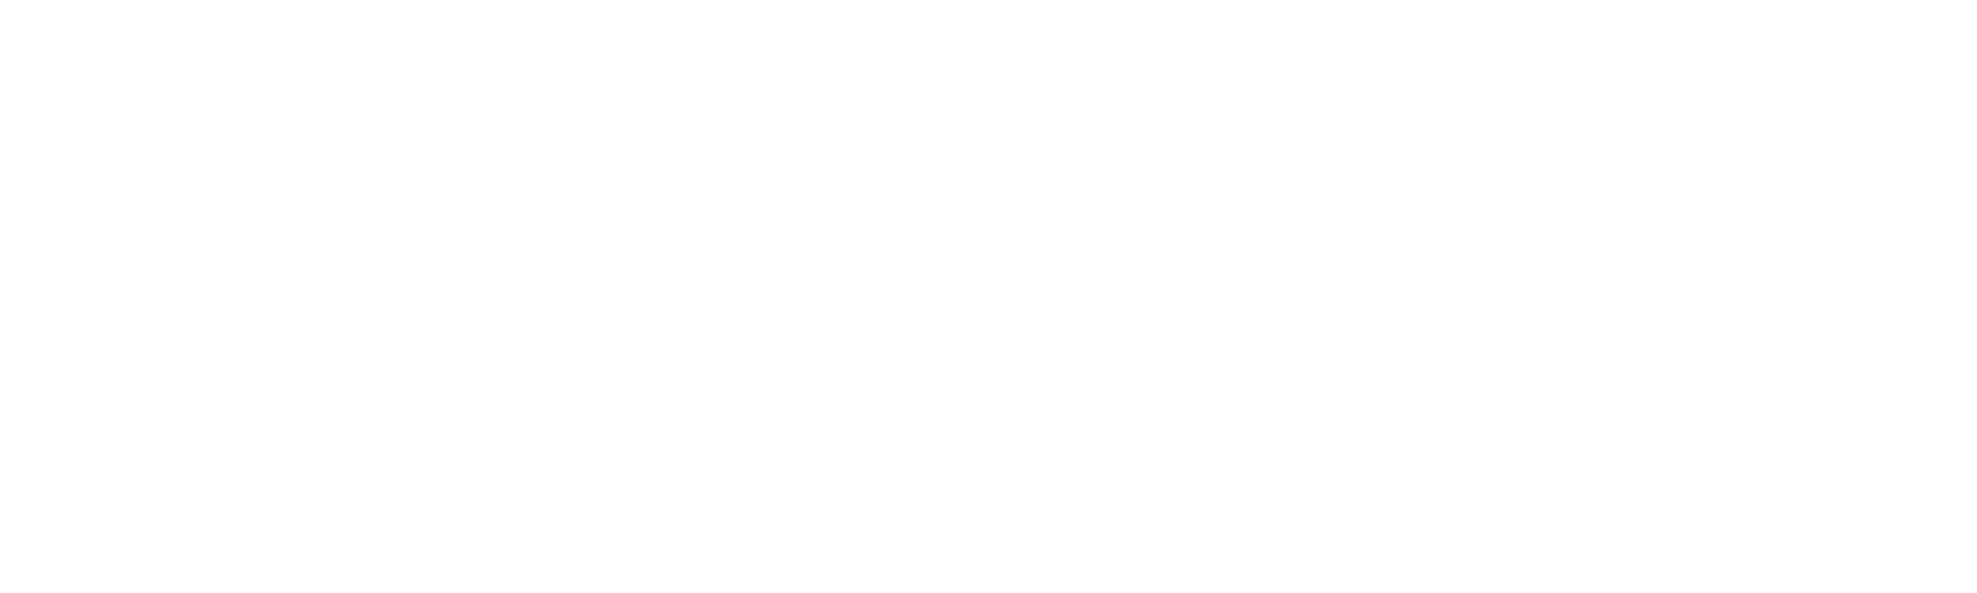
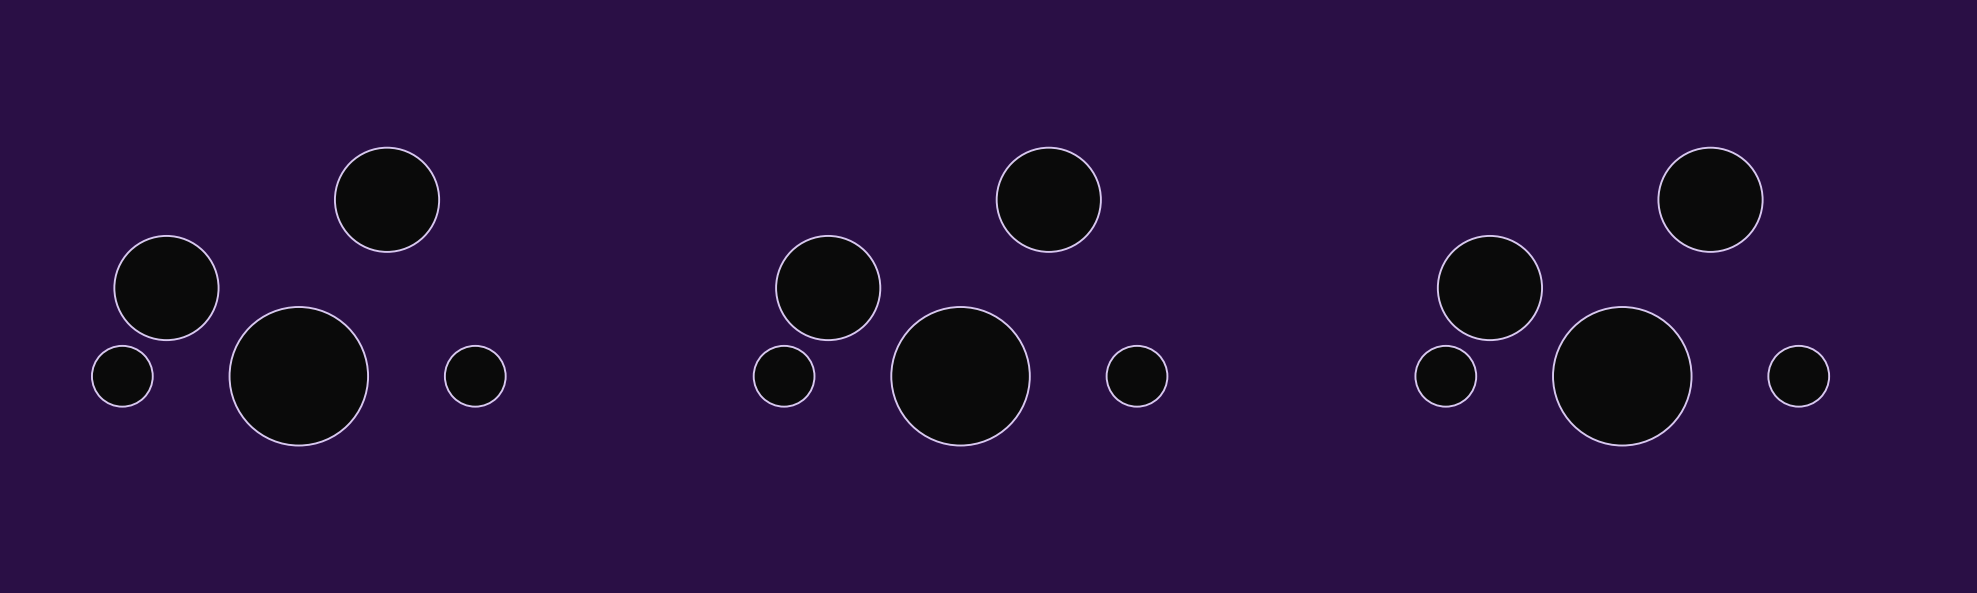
part: none -> (298, 296)
part: none -> (960, 296)
part: none -> (1622, 296)

